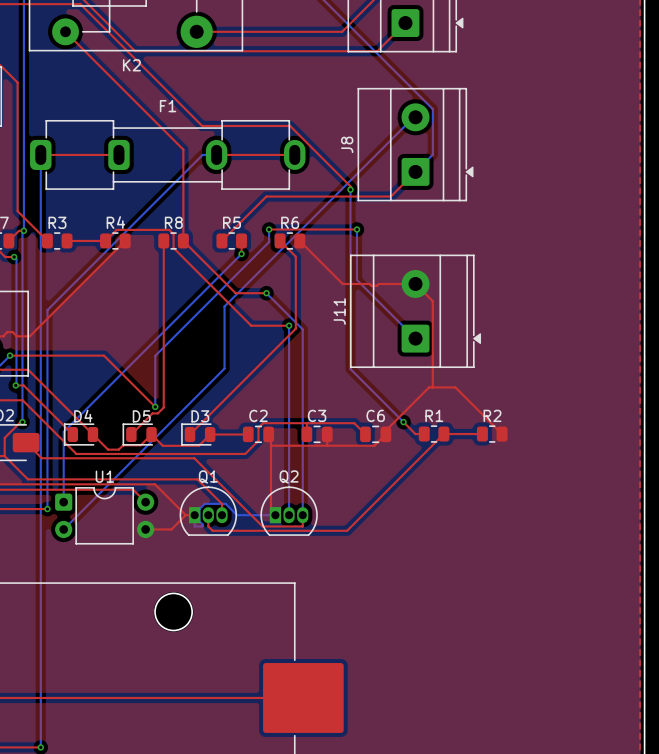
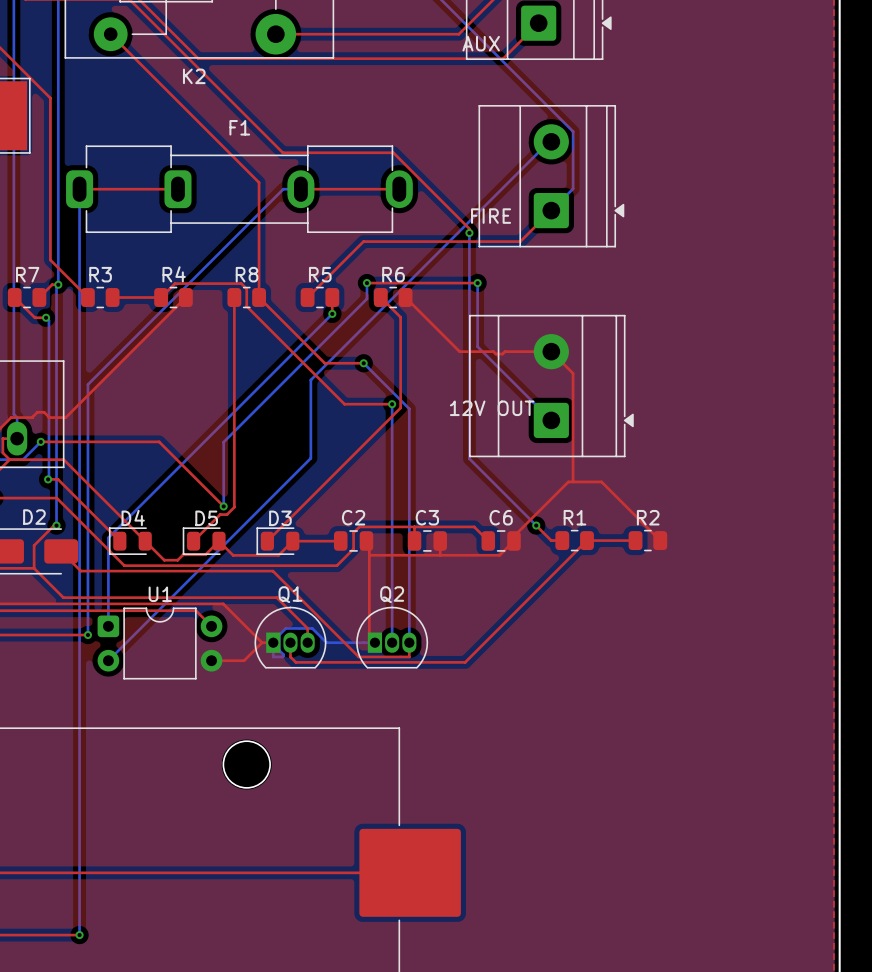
text: none -> AUX (481, 43)
J8 name: J8 (347, 144) -> none
text: none -> FIRE (491, 216)
J11 name: J11 (339, 311) -> none
text: none -> 12V OUT (492, 408)

